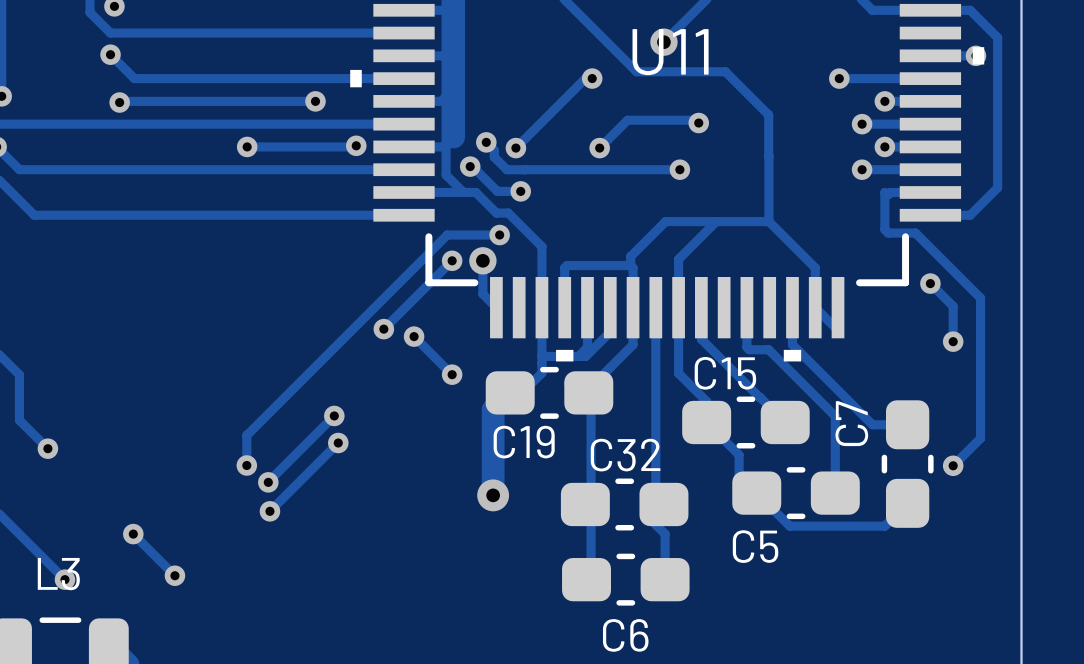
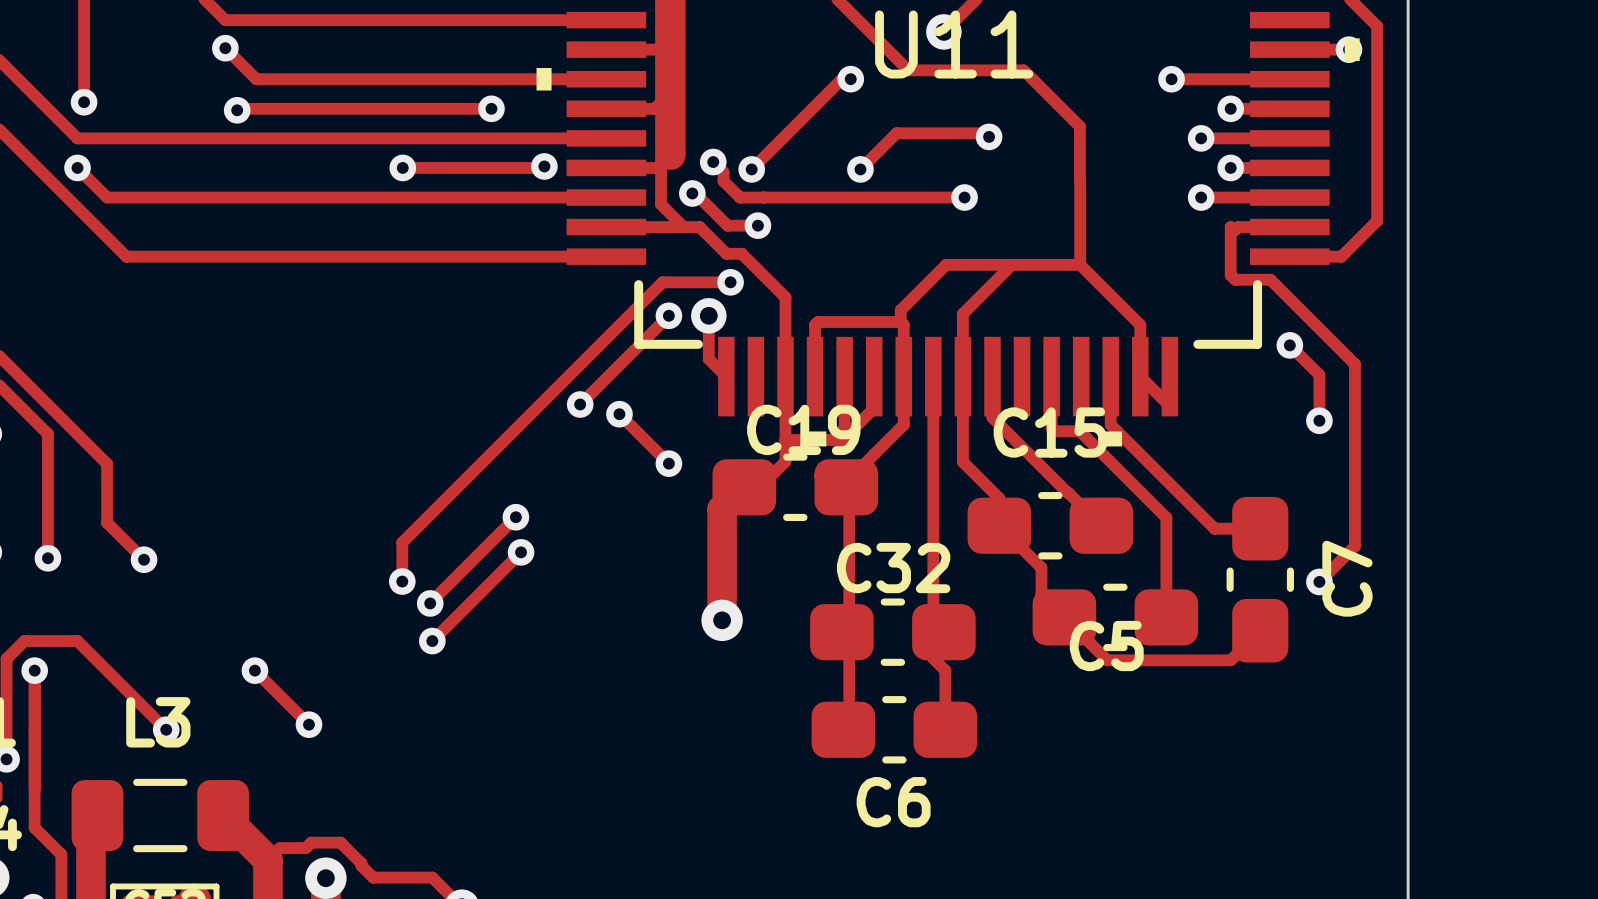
C15 name position: C15 (725, 373) -> C15 (1050, 432)
C7 name position: C7 (851, 423) -> C7 (1347, 578)
C19 name position: C19 (524, 442) -> C19 (803, 429)
C5 name position: C5 (755, 546) -> C5 (1106, 646)

